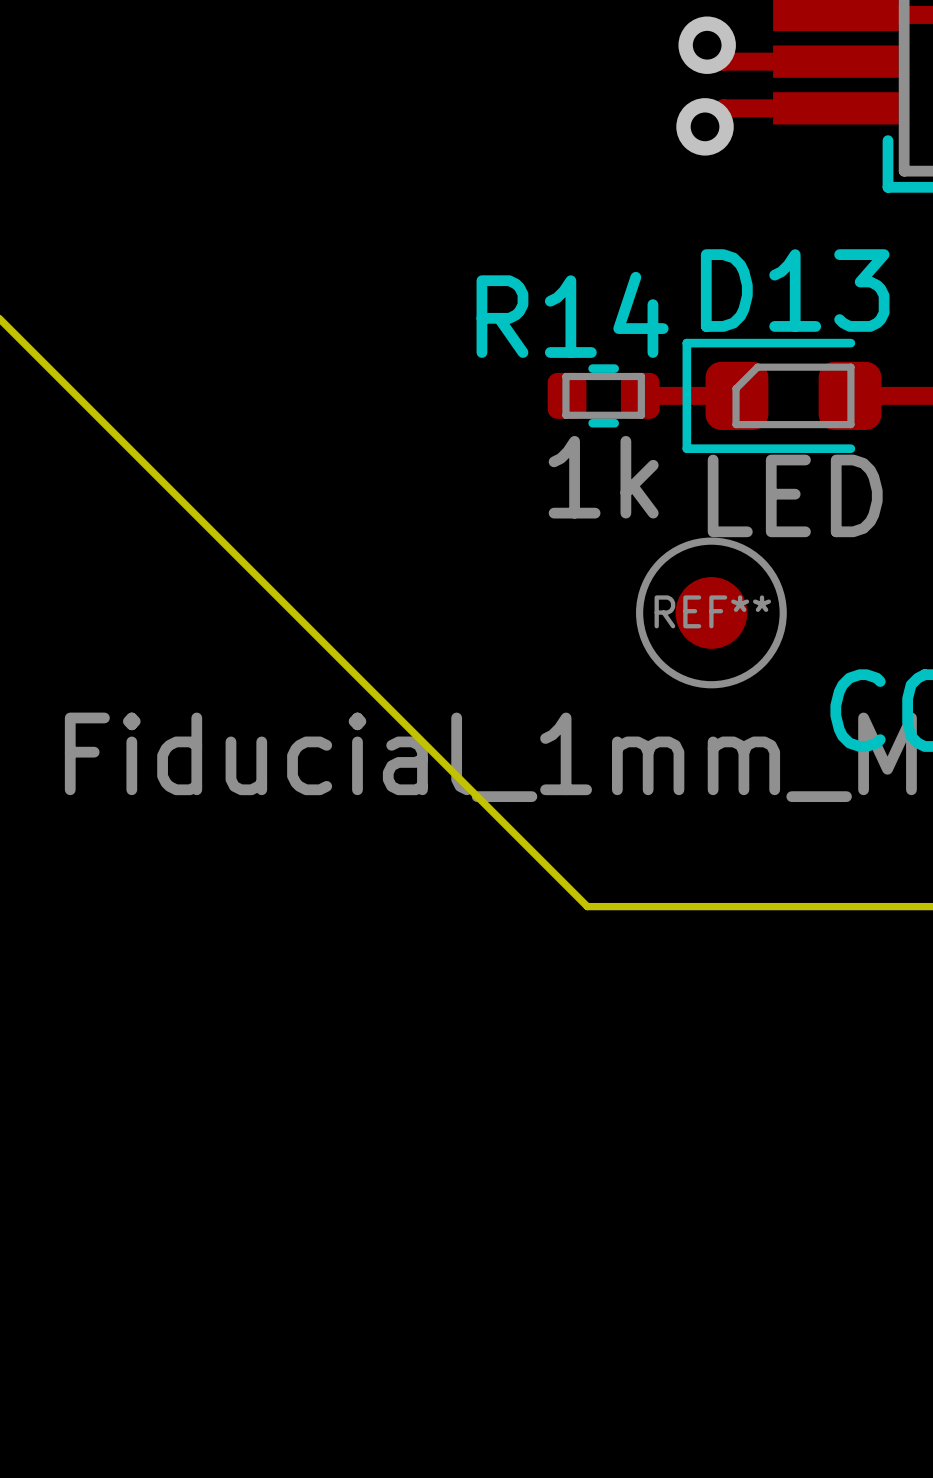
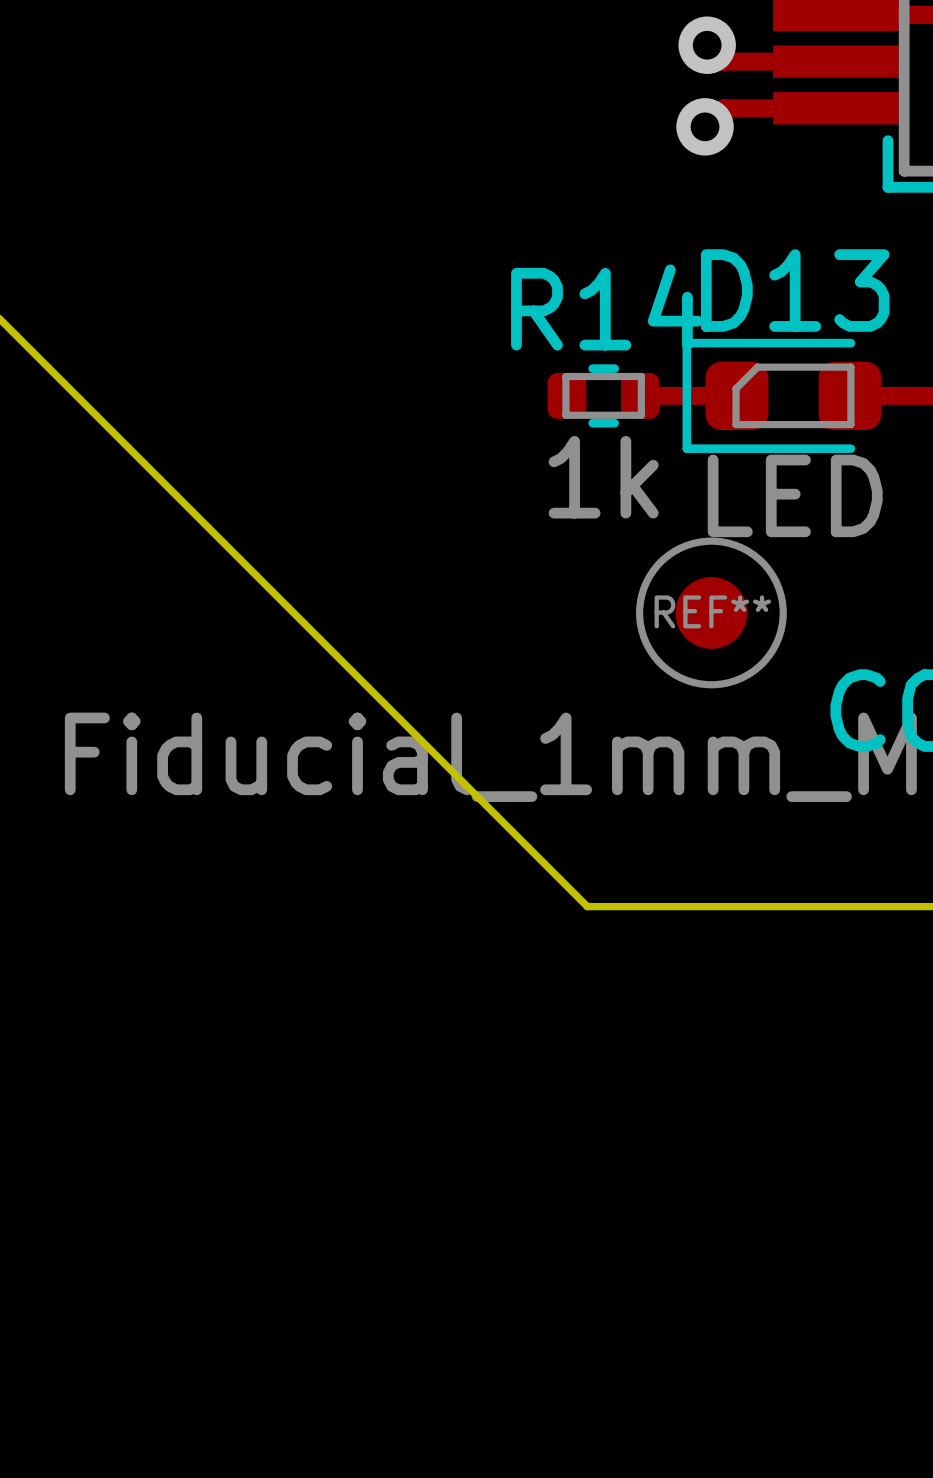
R14 name position: R14 (572, 314) -> R14 (607, 307)

